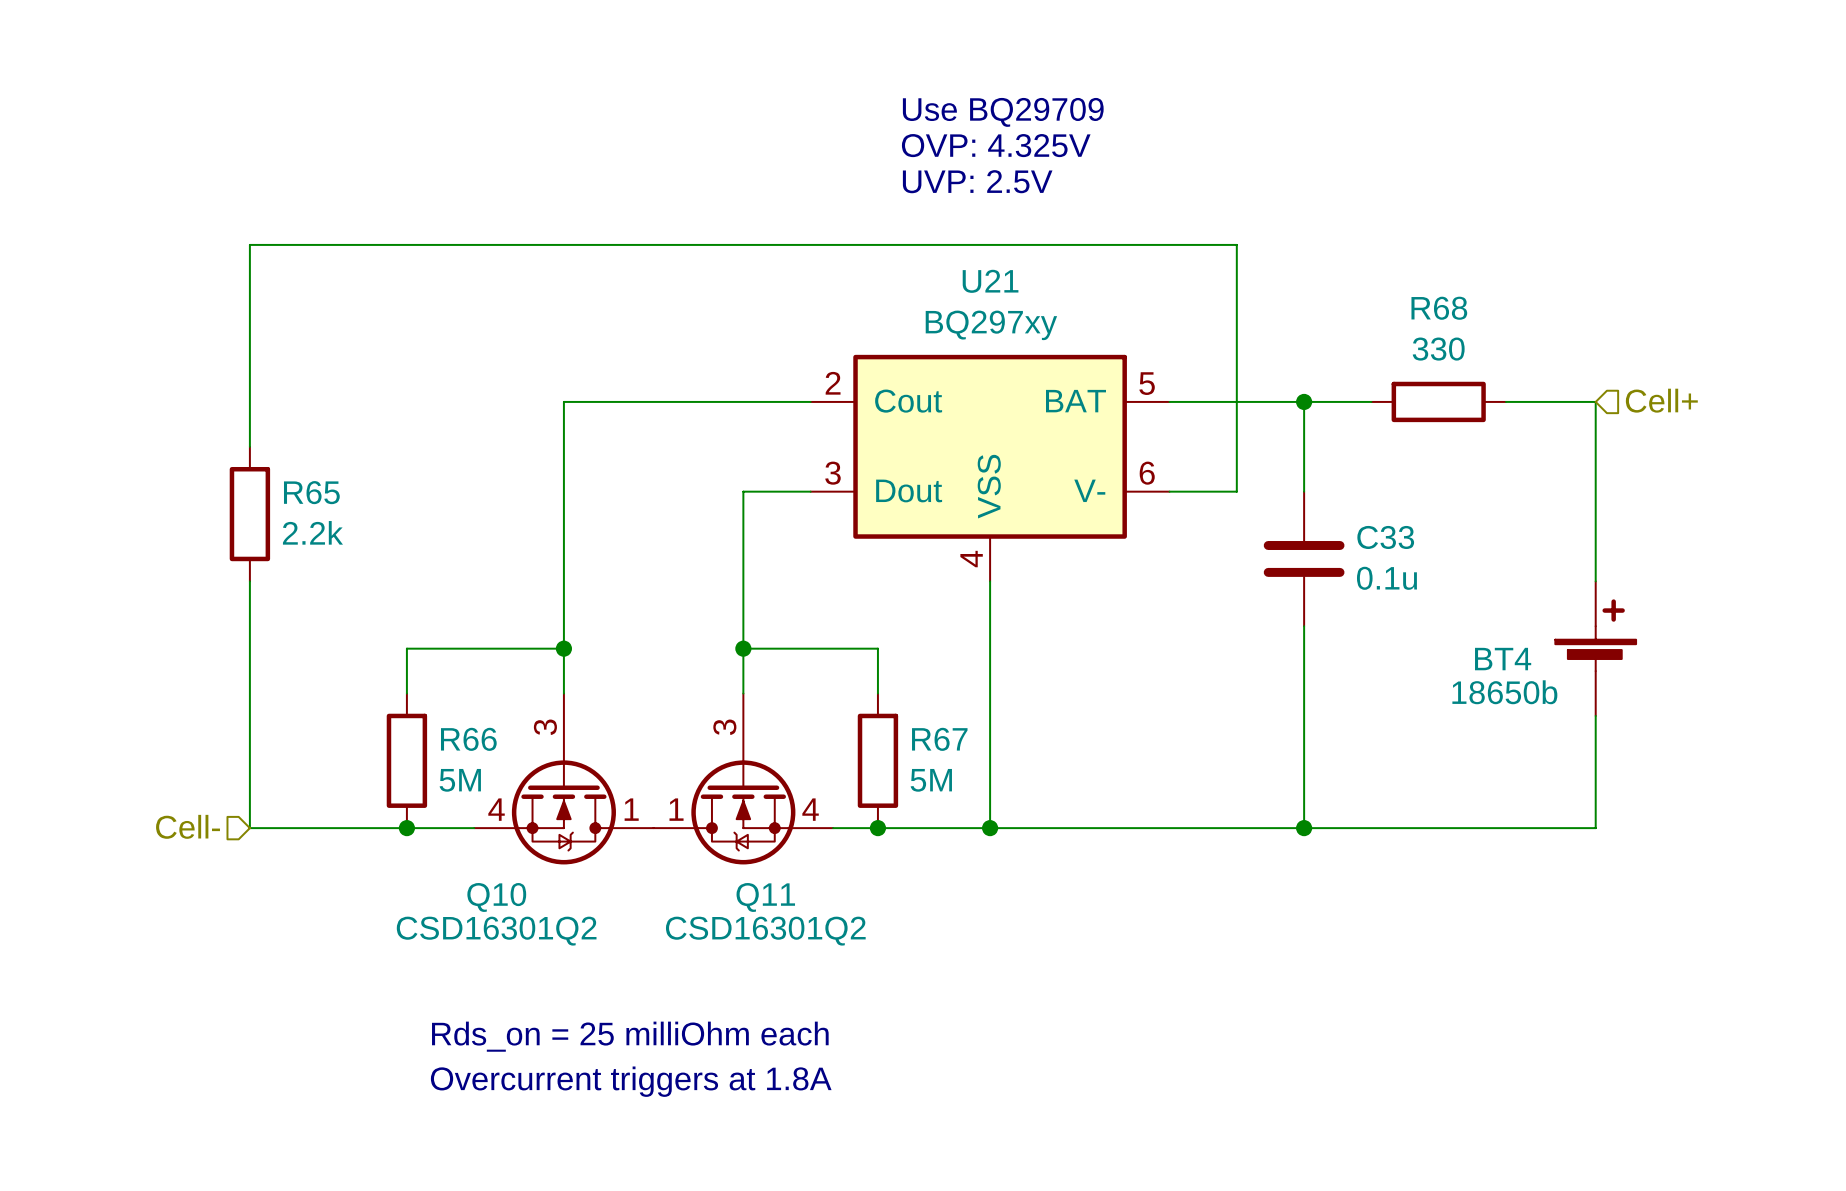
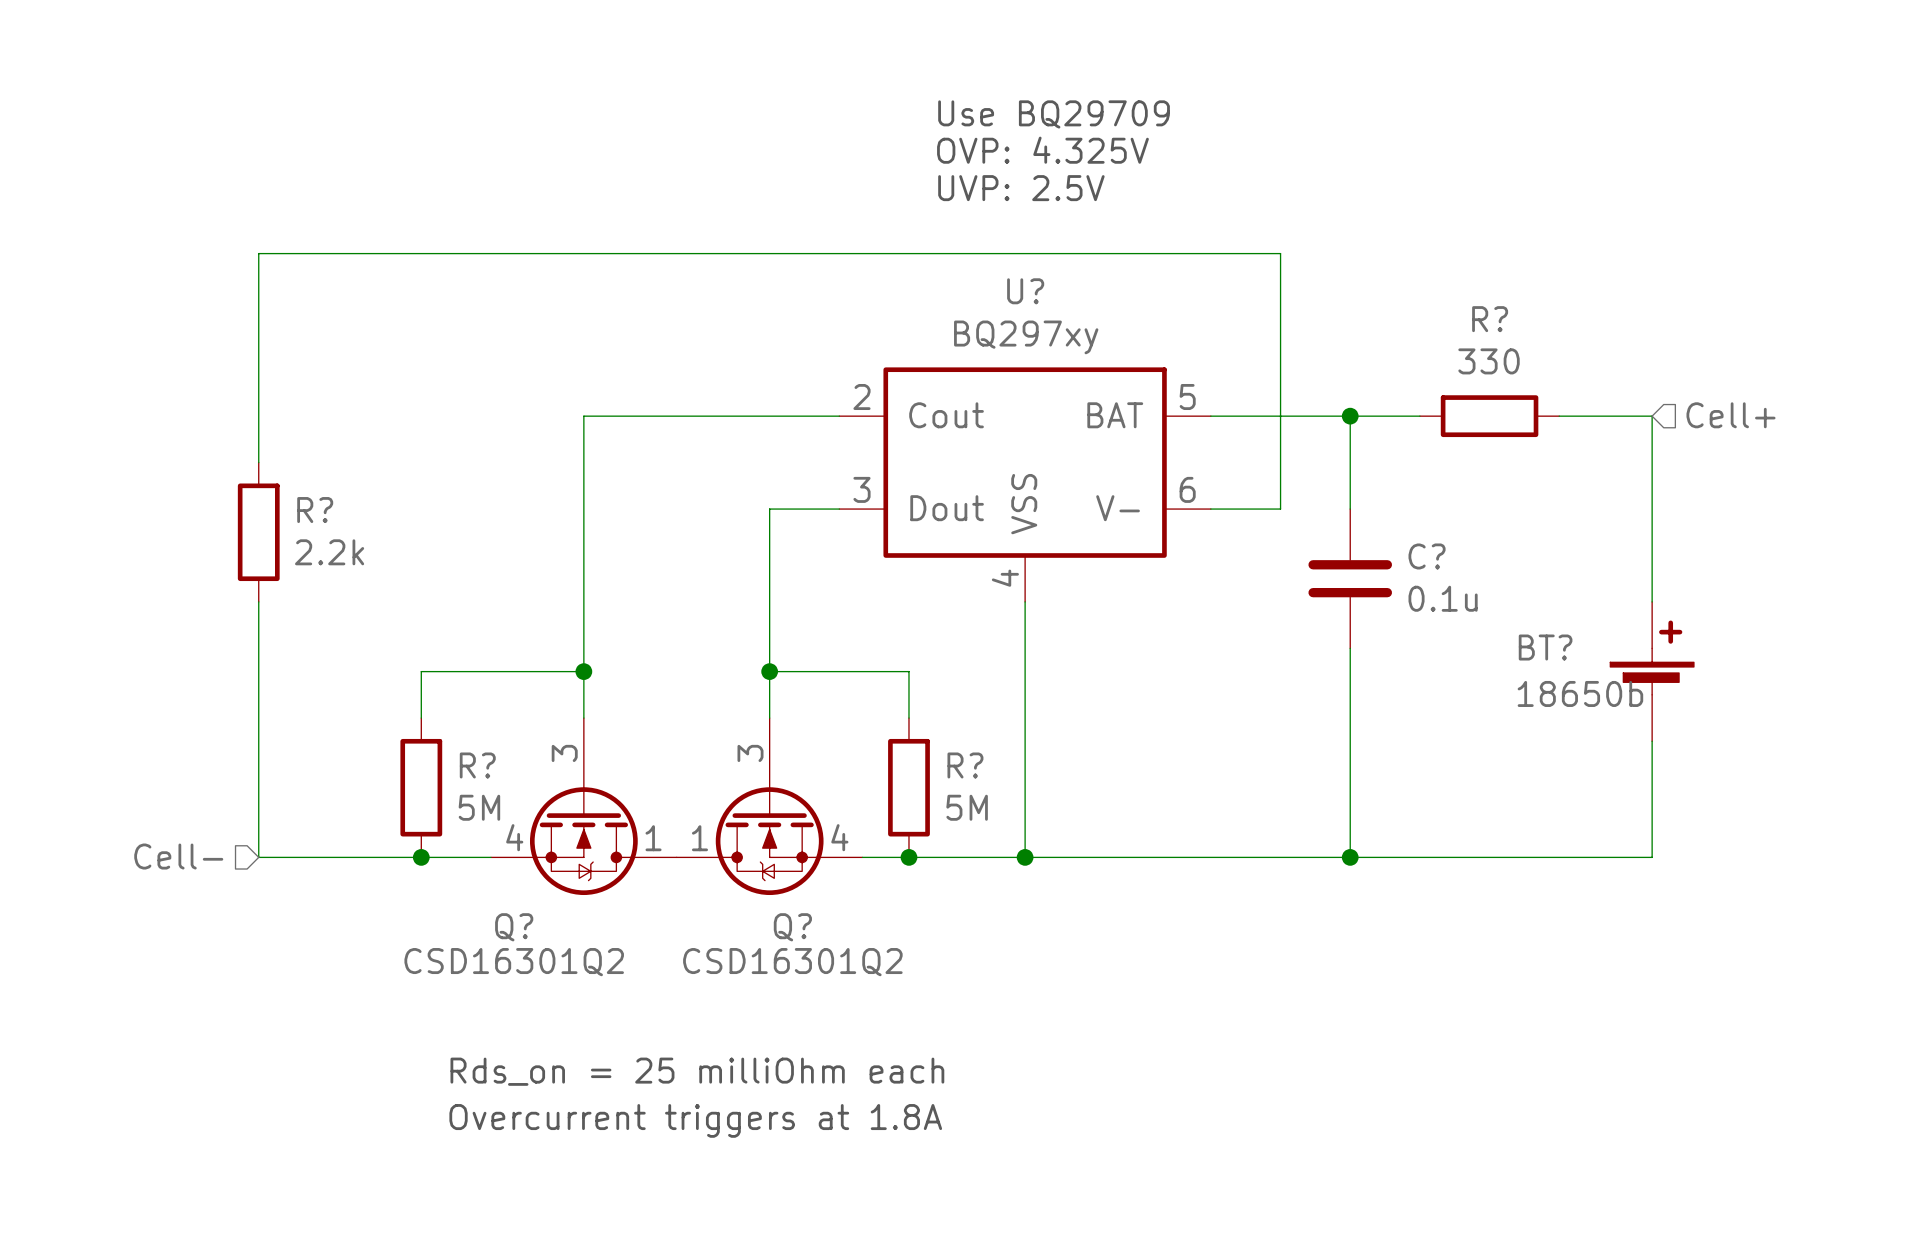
U21 name: U21 (990, 281) -> U? (1025, 291)
R68 name: R68 (1439, 308) -> R? (1490, 319)
R65 name: R65 (311, 492) -> R? (315, 510)
C33 name: C33 (1385, 537) -> C? (1427, 556)
BT4 name: BT4 (1503, 659) -> BT? (1545, 647)
BT4 value position: 18650b (1504, 692) -> 18650b (1580, 693)
R66 name: R66 (468, 739) -> R? (477, 765)
R67 name: R67 (939, 739) -> R? (965, 765)
Q10 name: Q10 (496, 897) -> Q? (514, 927)
Q11 name: Q11 (765, 897) -> Q? (792, 927)

